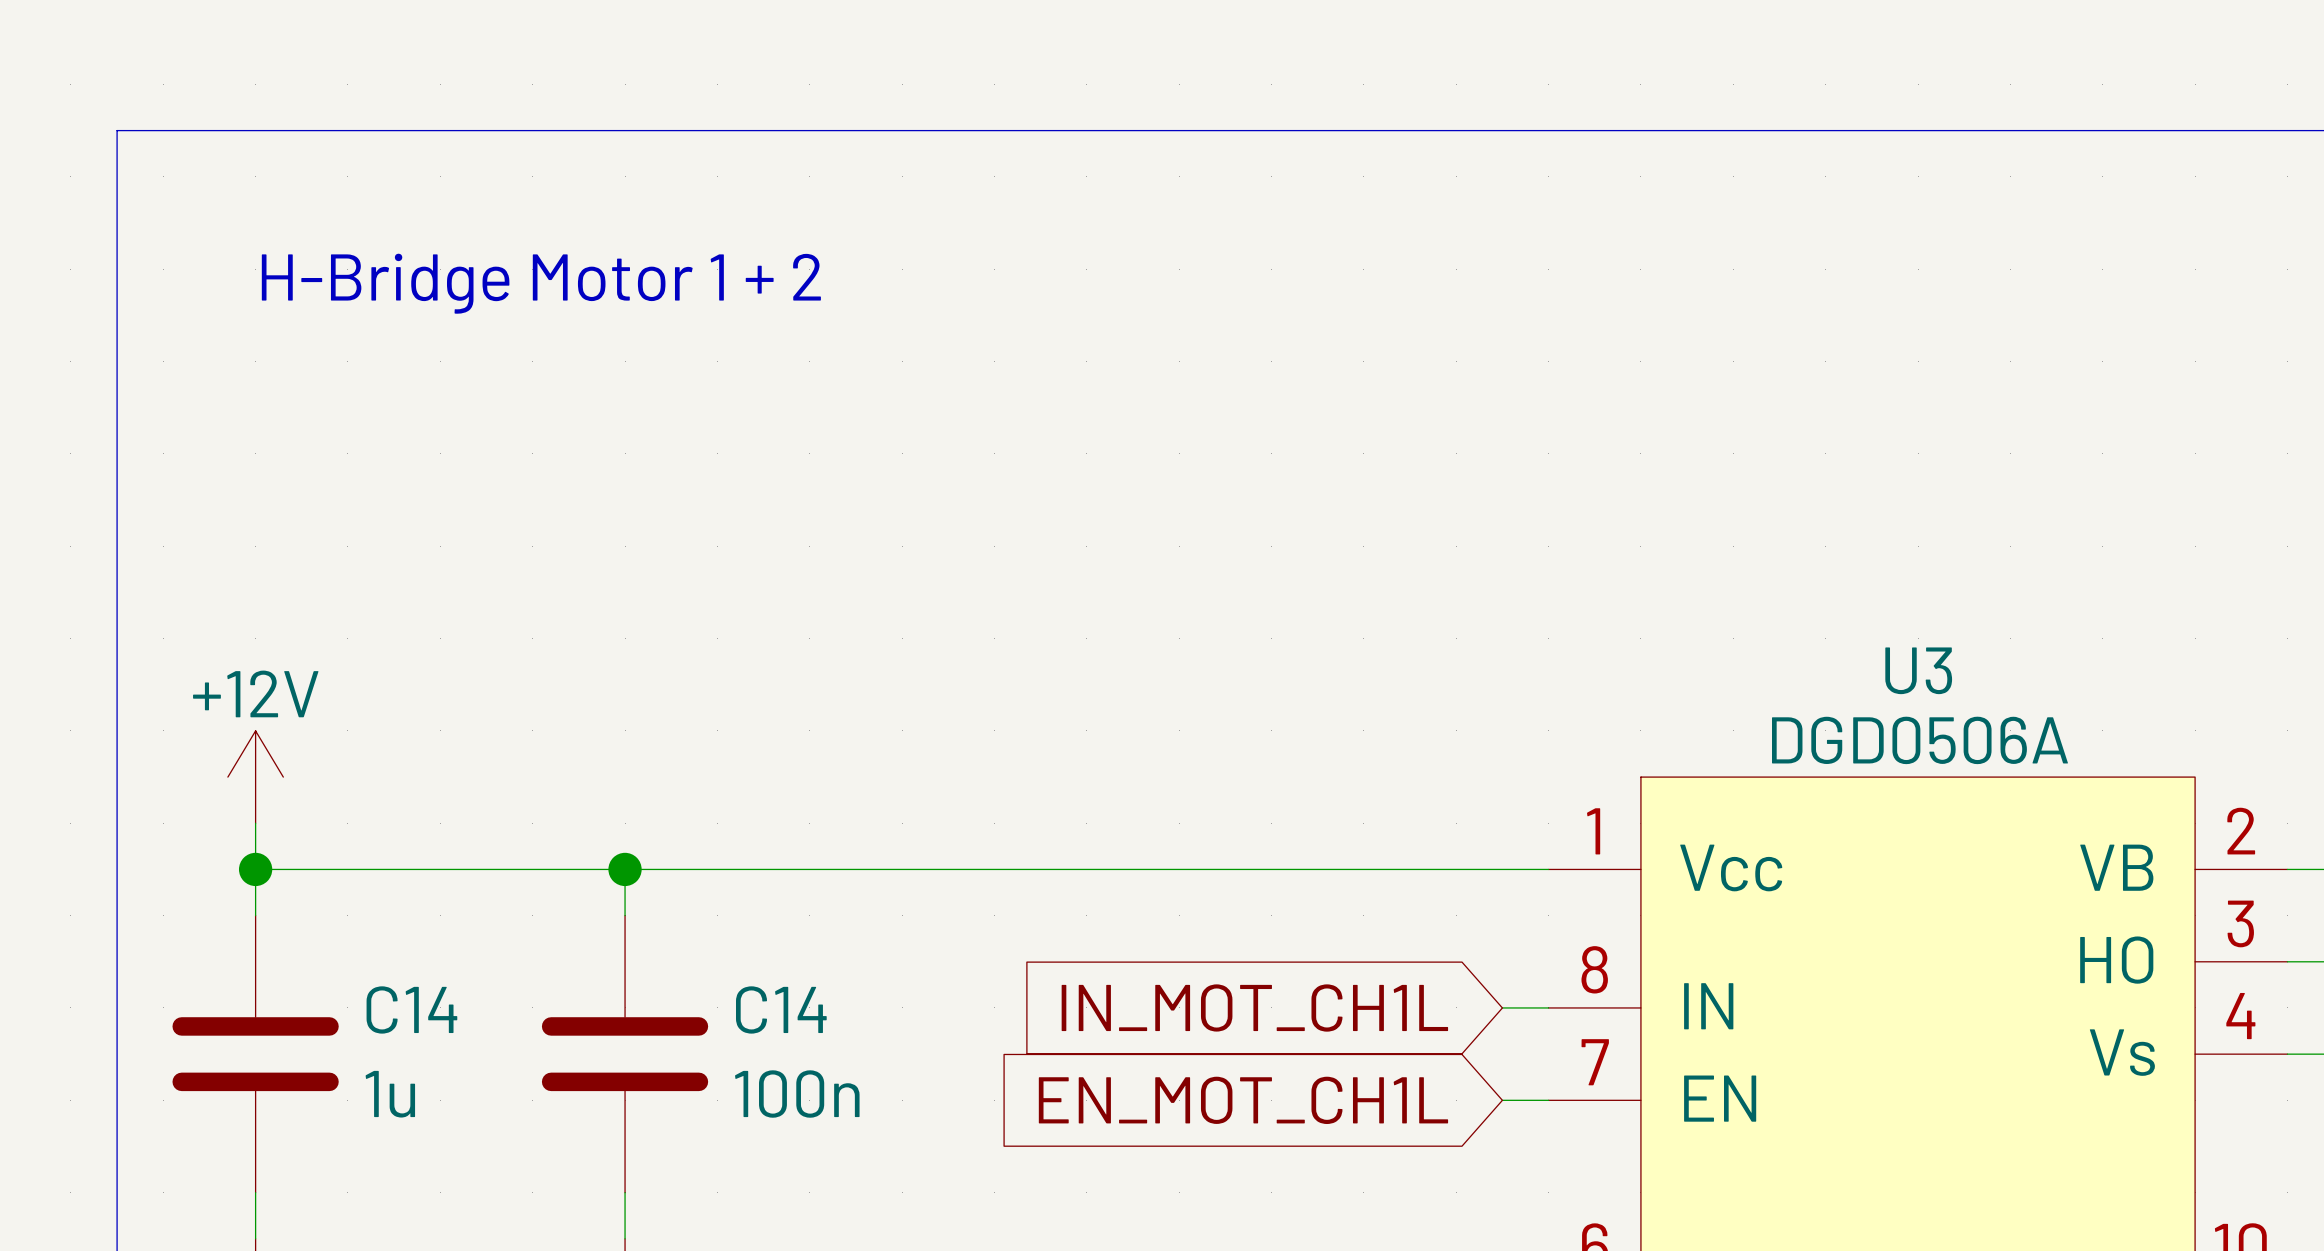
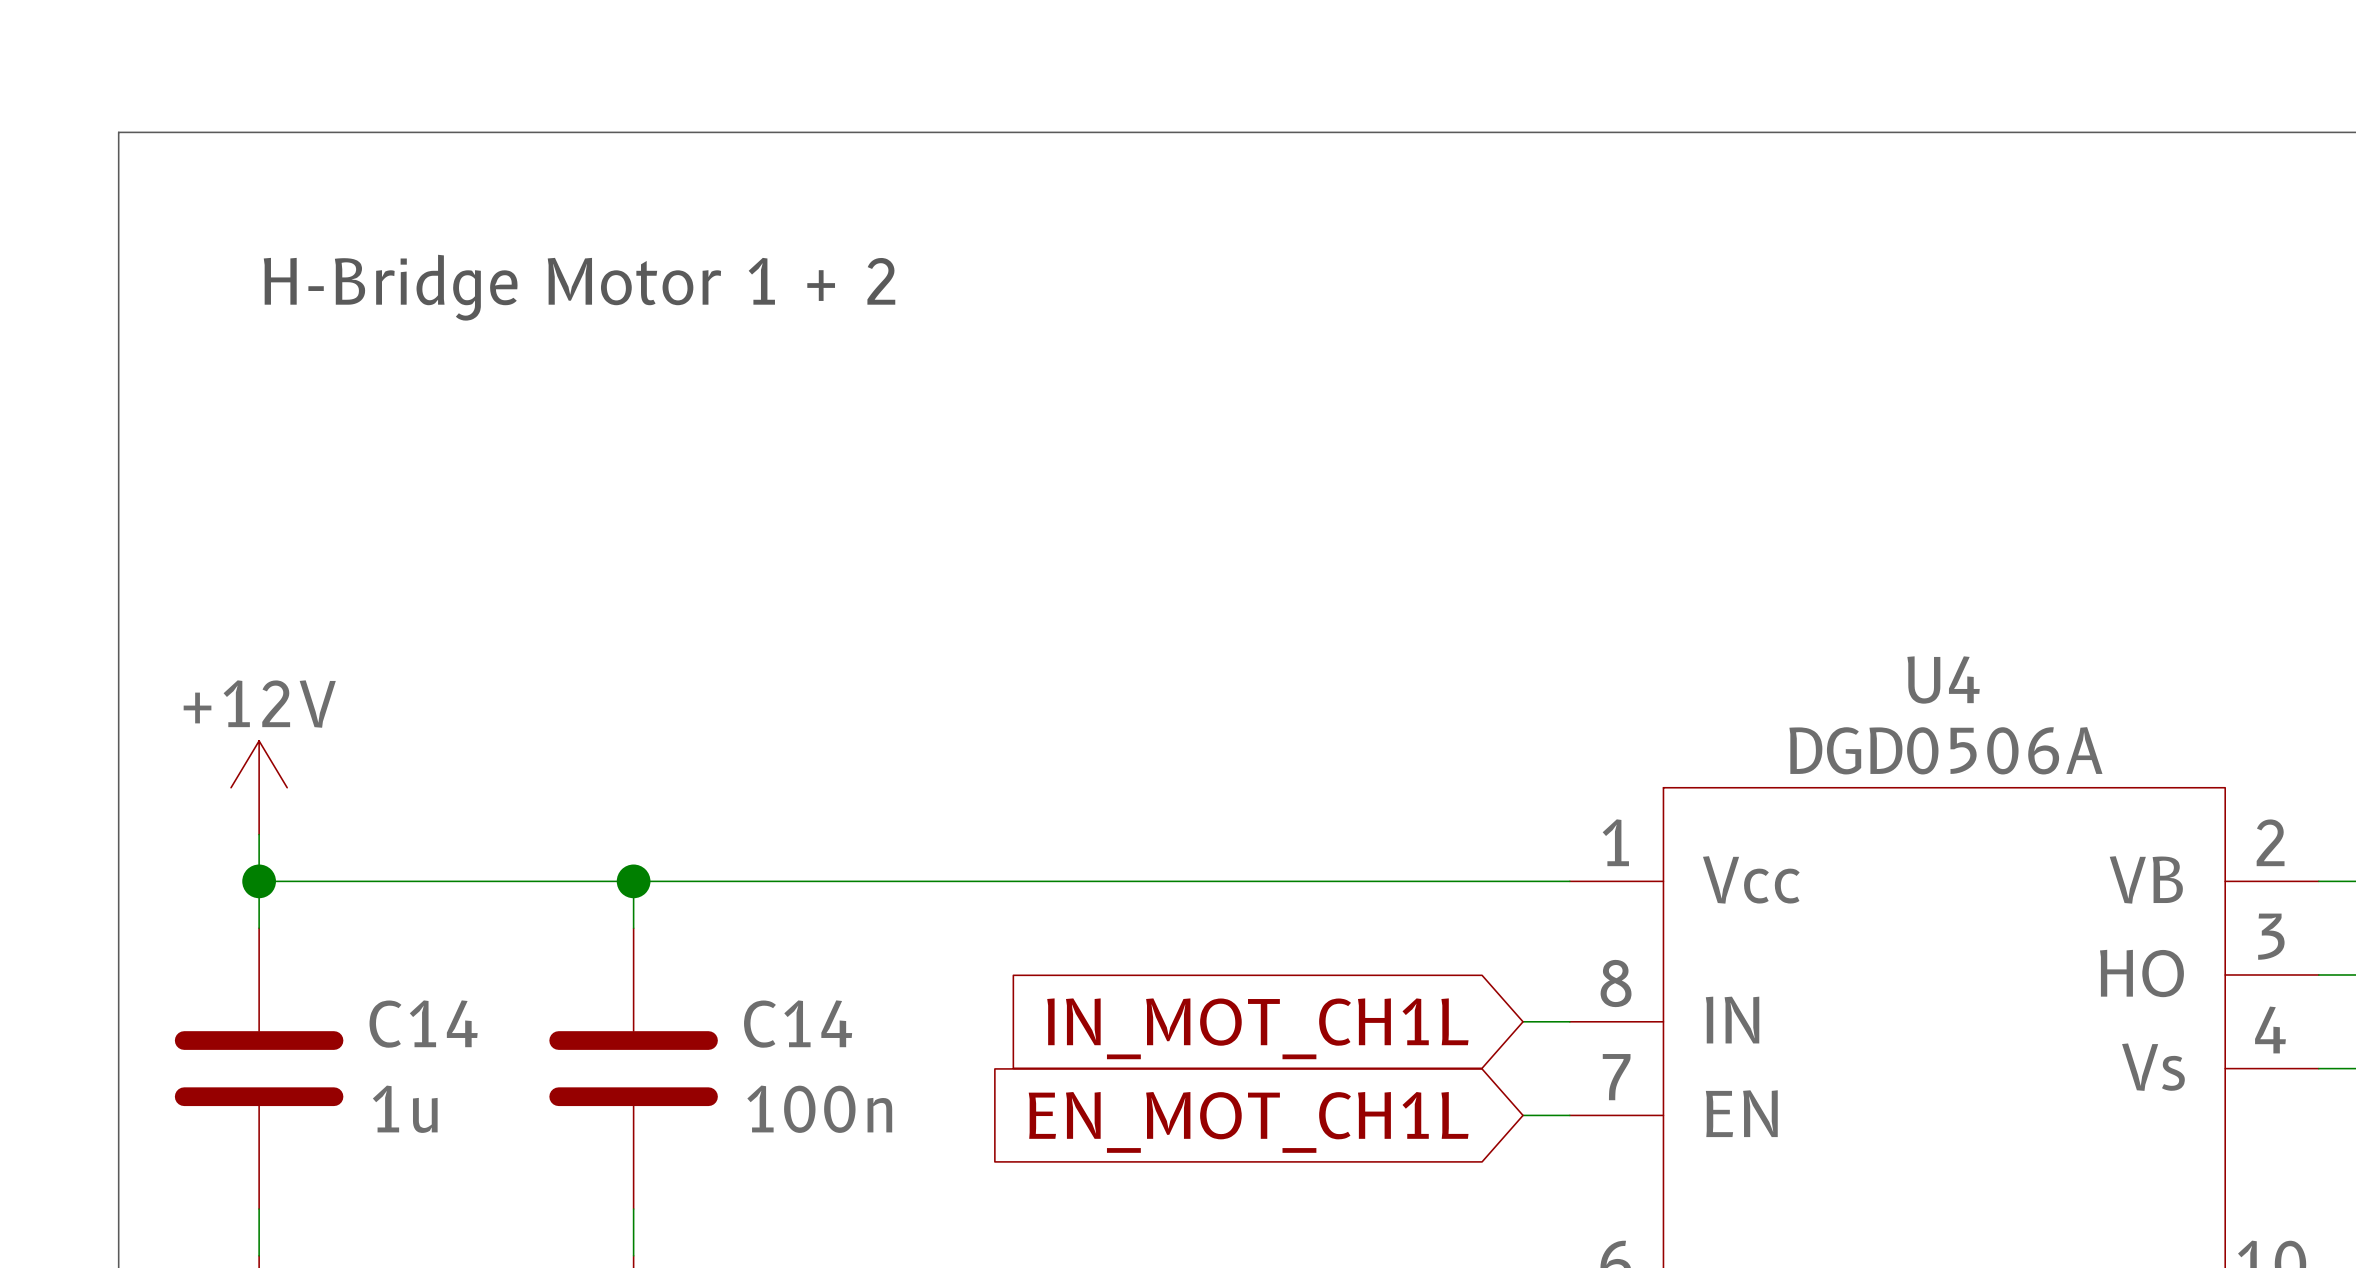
U3 name: U3 (1918, 670) -> U4 (1943, 679)

